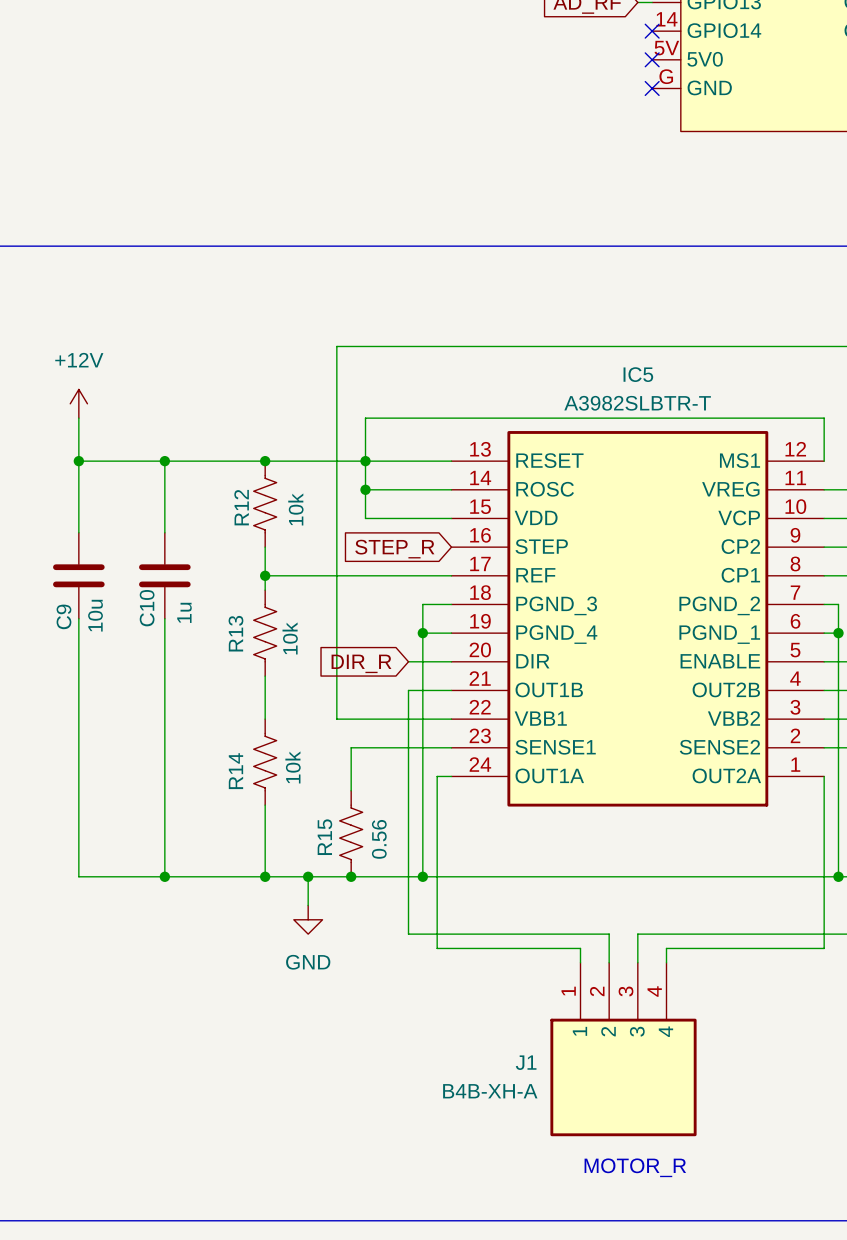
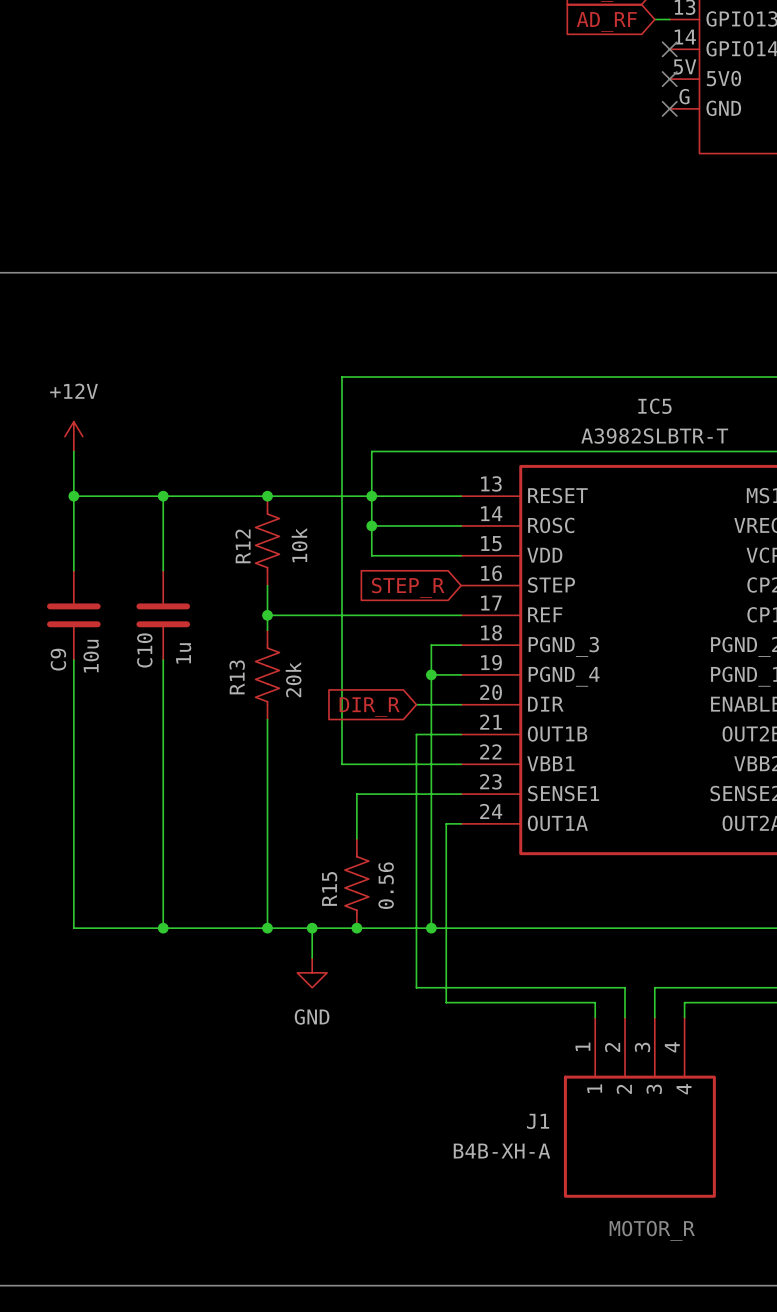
R13 value: 10k (290, 638) -> 20k (293, 679)
R14: 10k (265, 762) -> none

